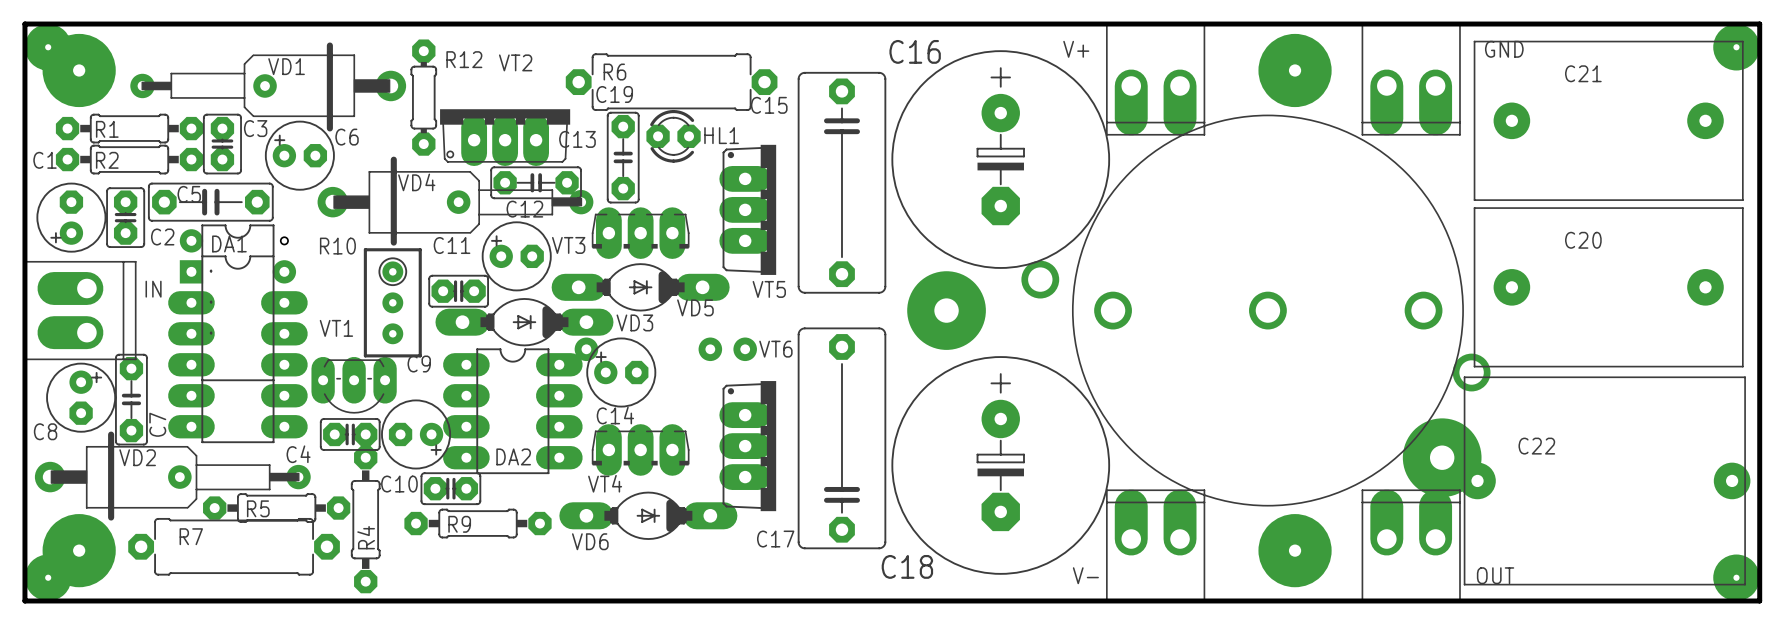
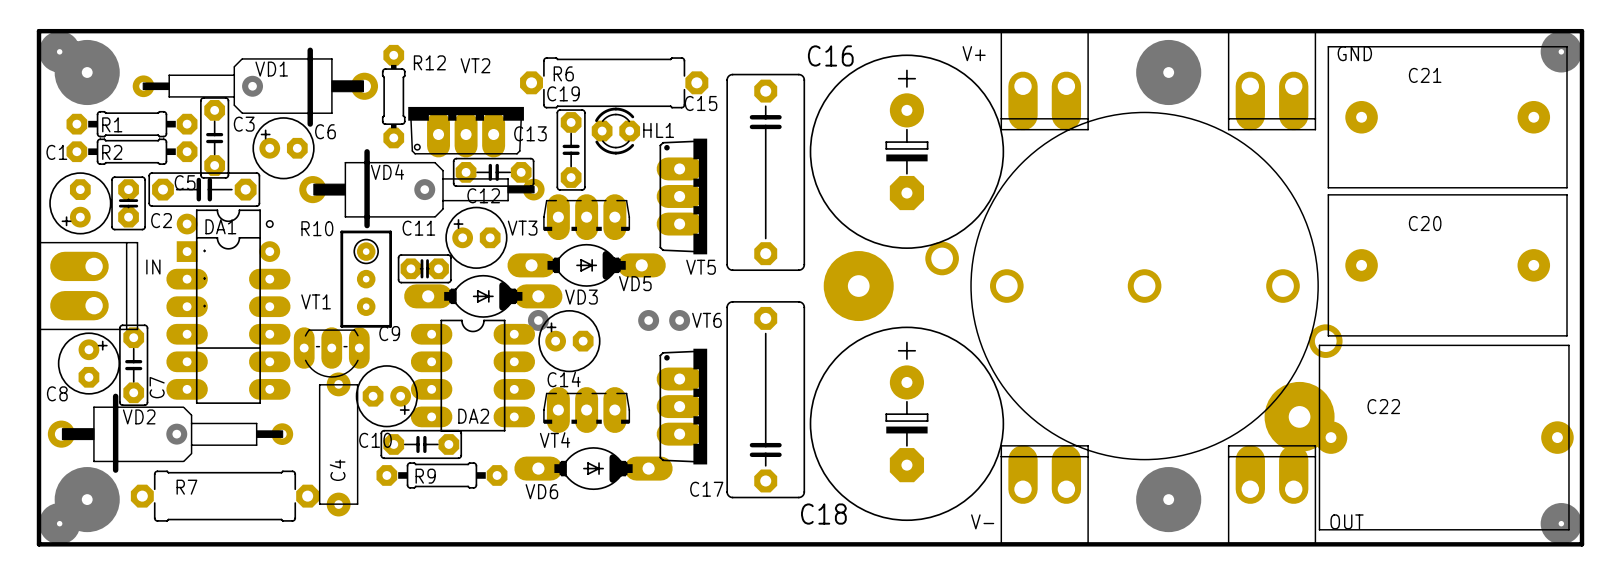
C3 footprint: [202, 113, 242, 175] -> [200, 97, 230, 179]
C4 footprint: [319, 418, 381, 451] -> [318, 372, 359, 517]
C4 name position: C4 (298, 454) -> C4 (337, 470)
C10 footprint: [420, 472, 482, 506] -> [380, 429, 463, 460]
R5: (276, 508) -> none
R4: (365, 519) -> none

